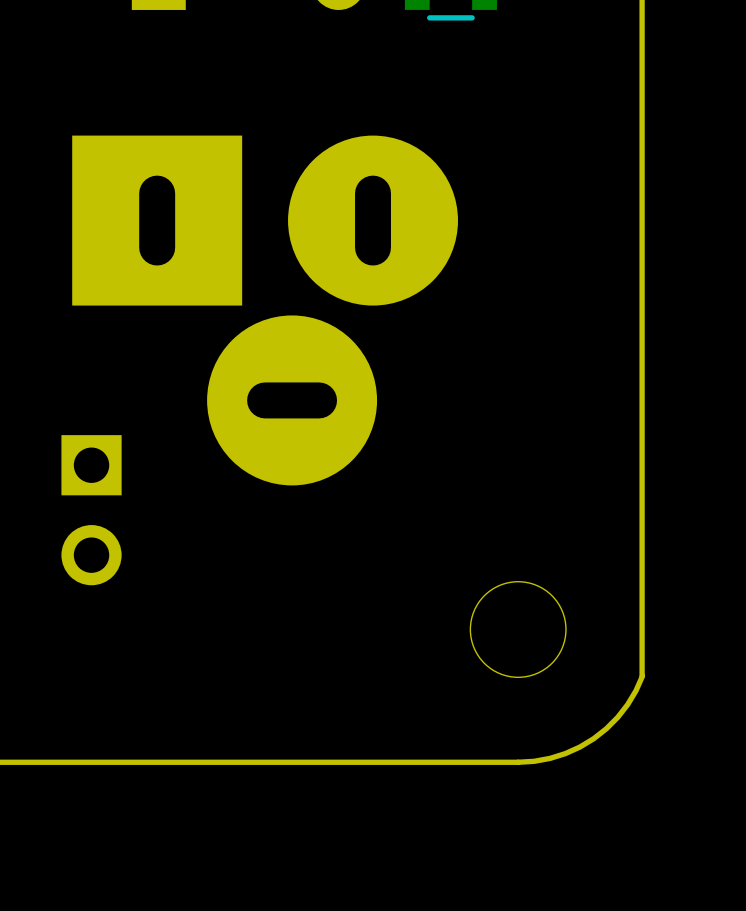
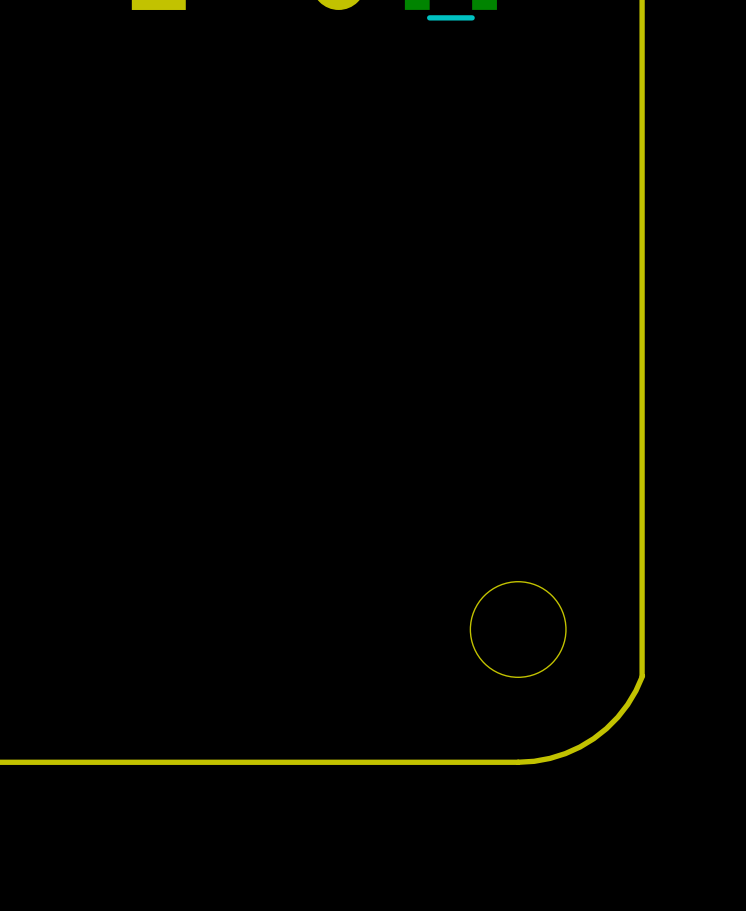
part: (265, 310) -> none
part: (91, 510) -> none

